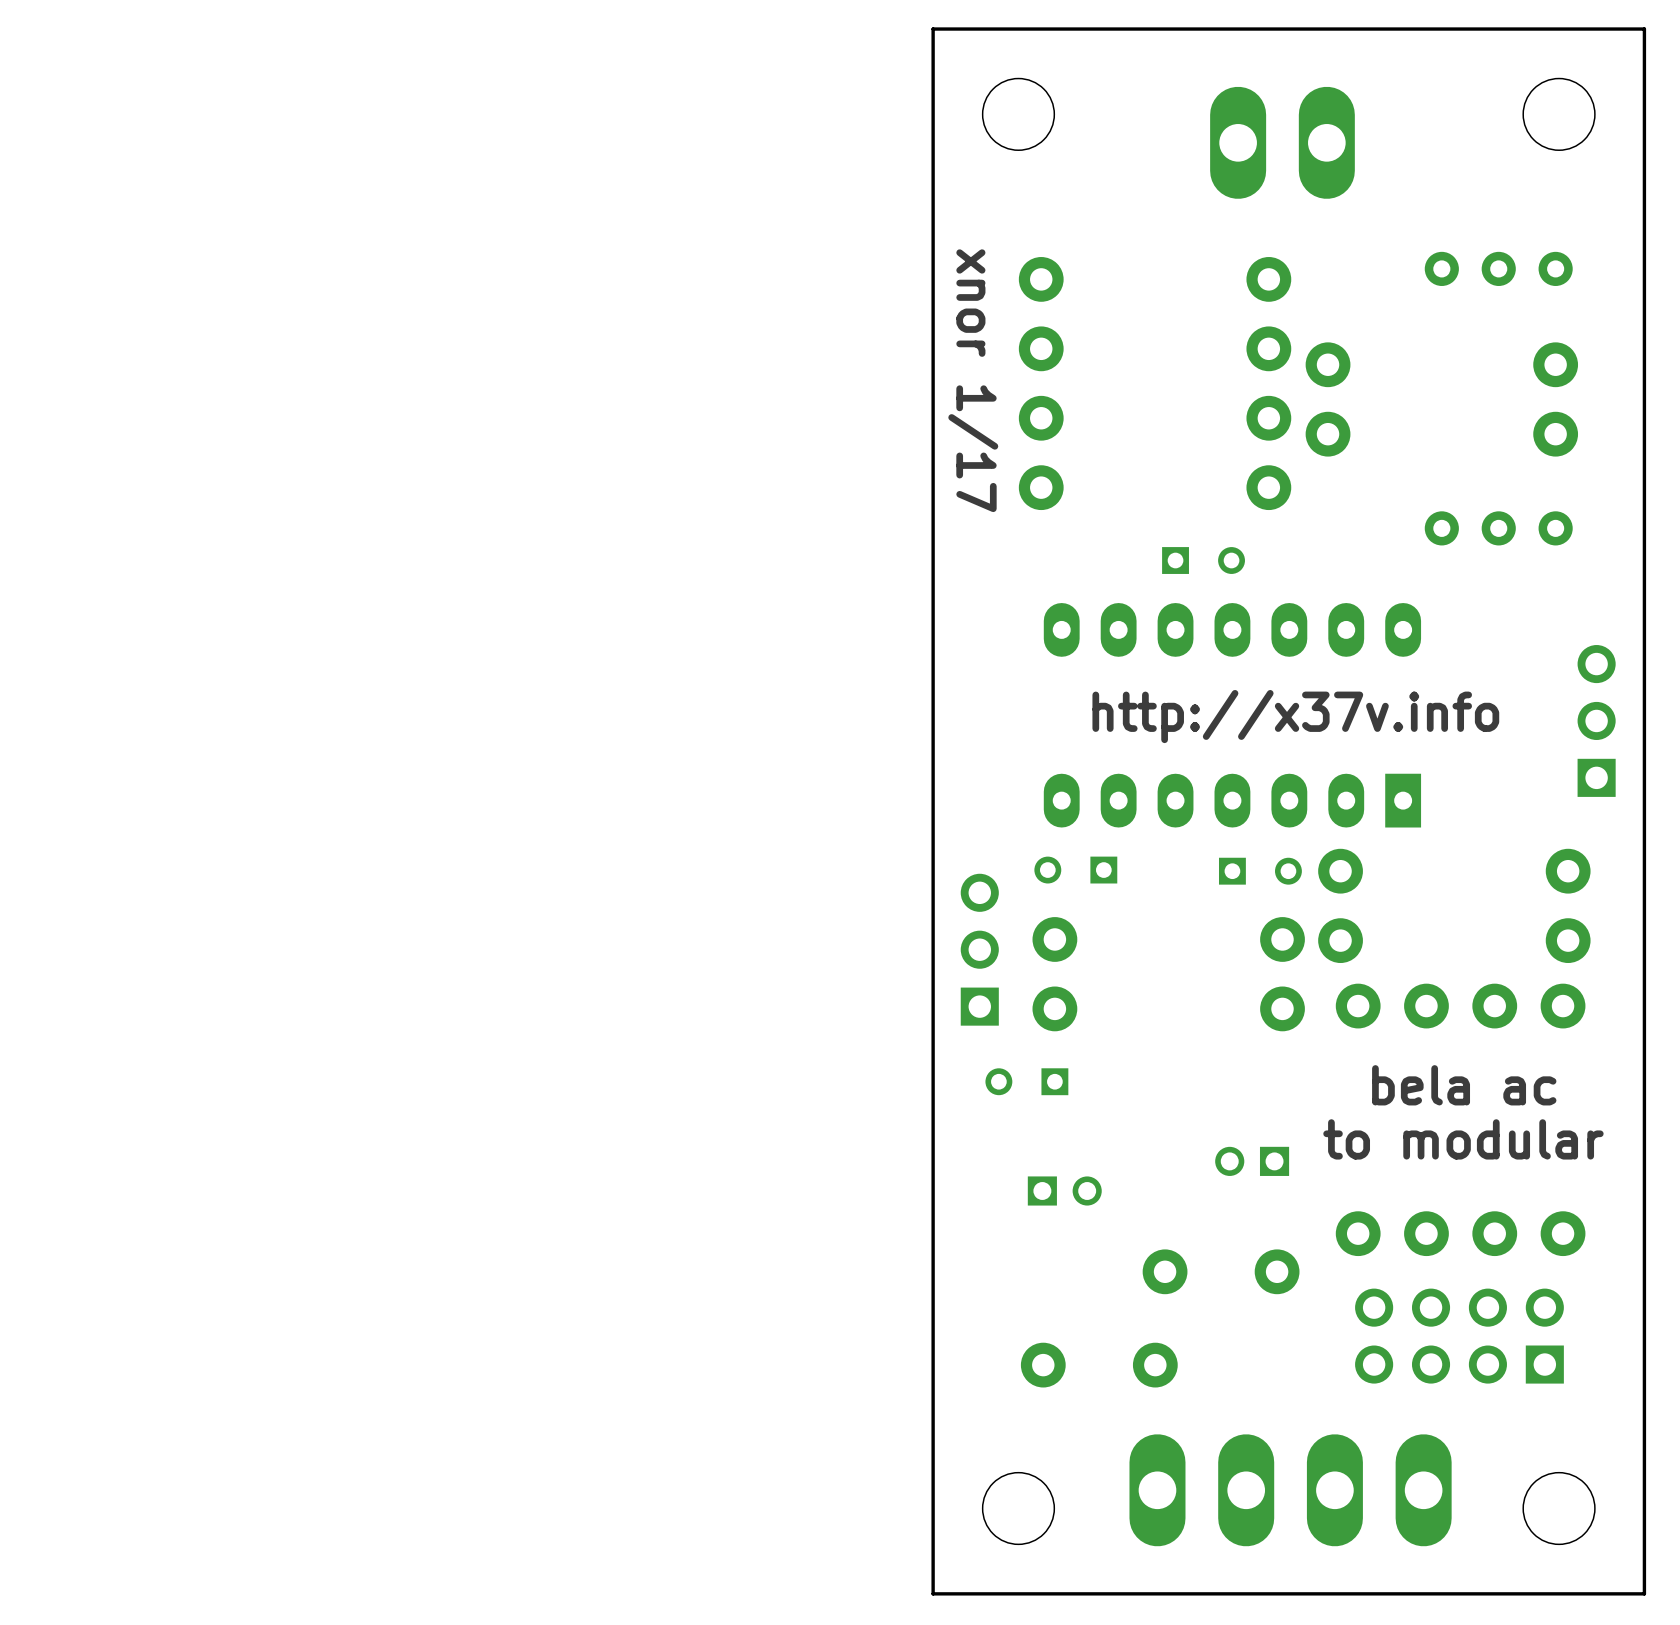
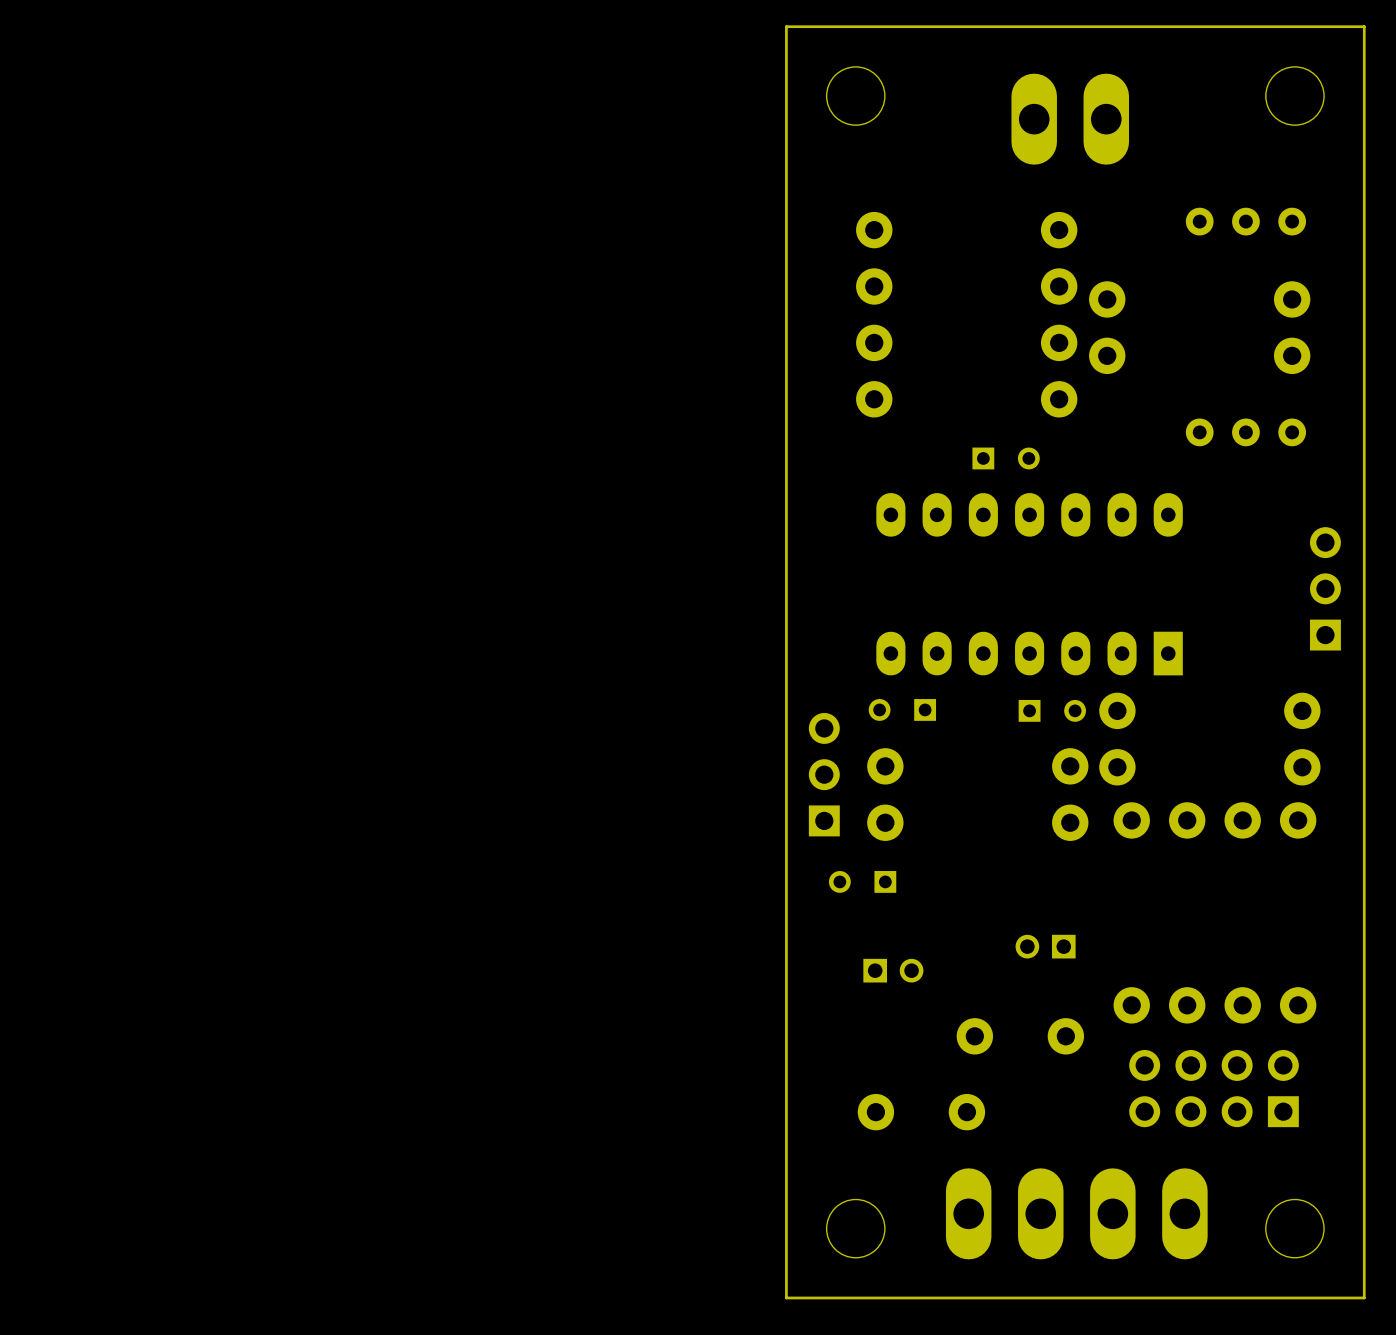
text: xnor 1/17 (973, 380) -> none
text: http://x37v.info (1295, 716) -> none
text: bela ac (1464, 1085) -> none
text: to modular (1463, 1139) -> none

